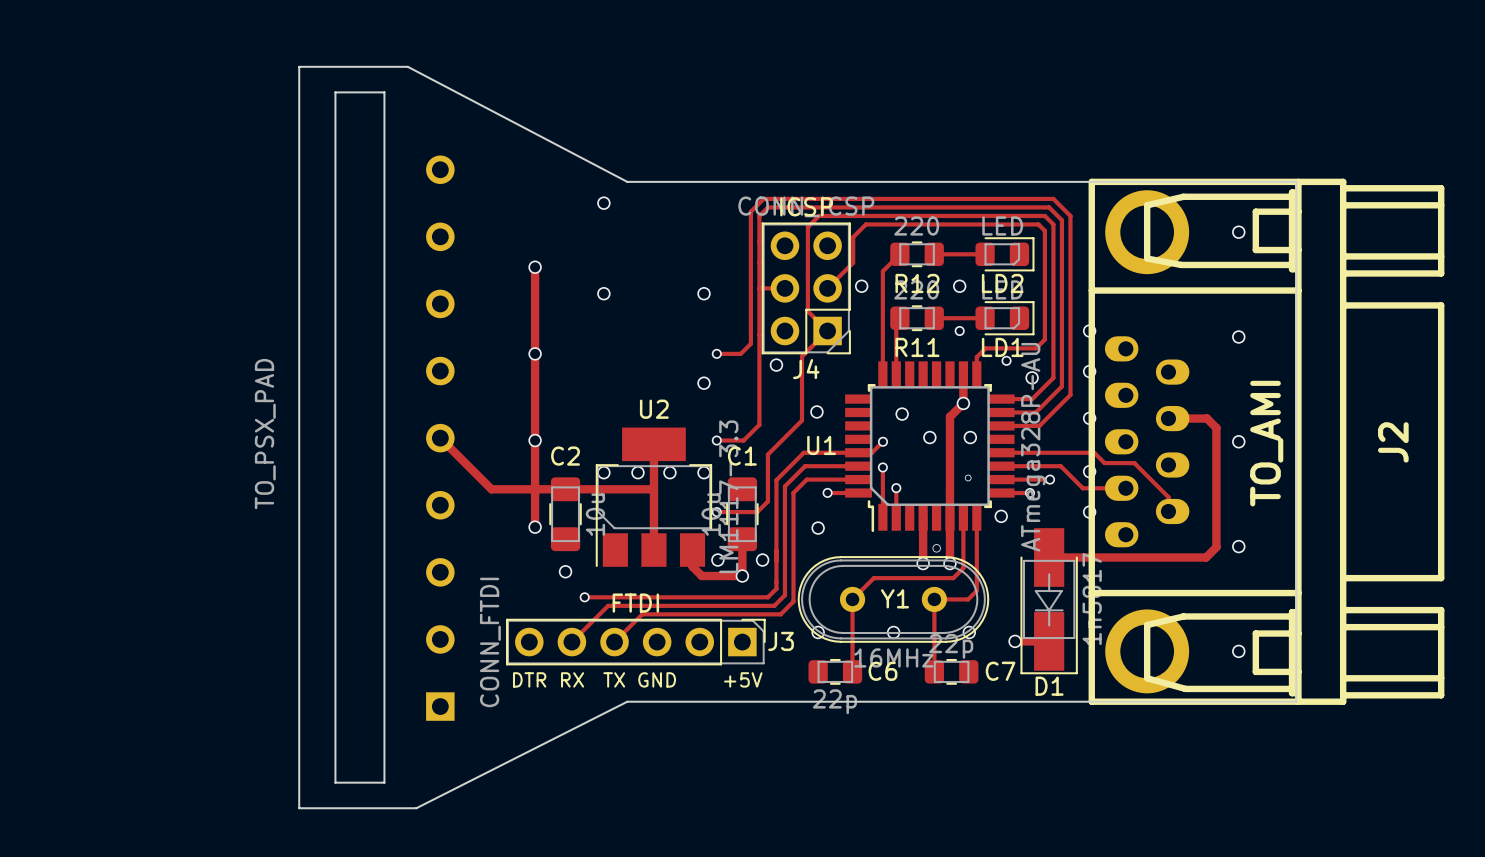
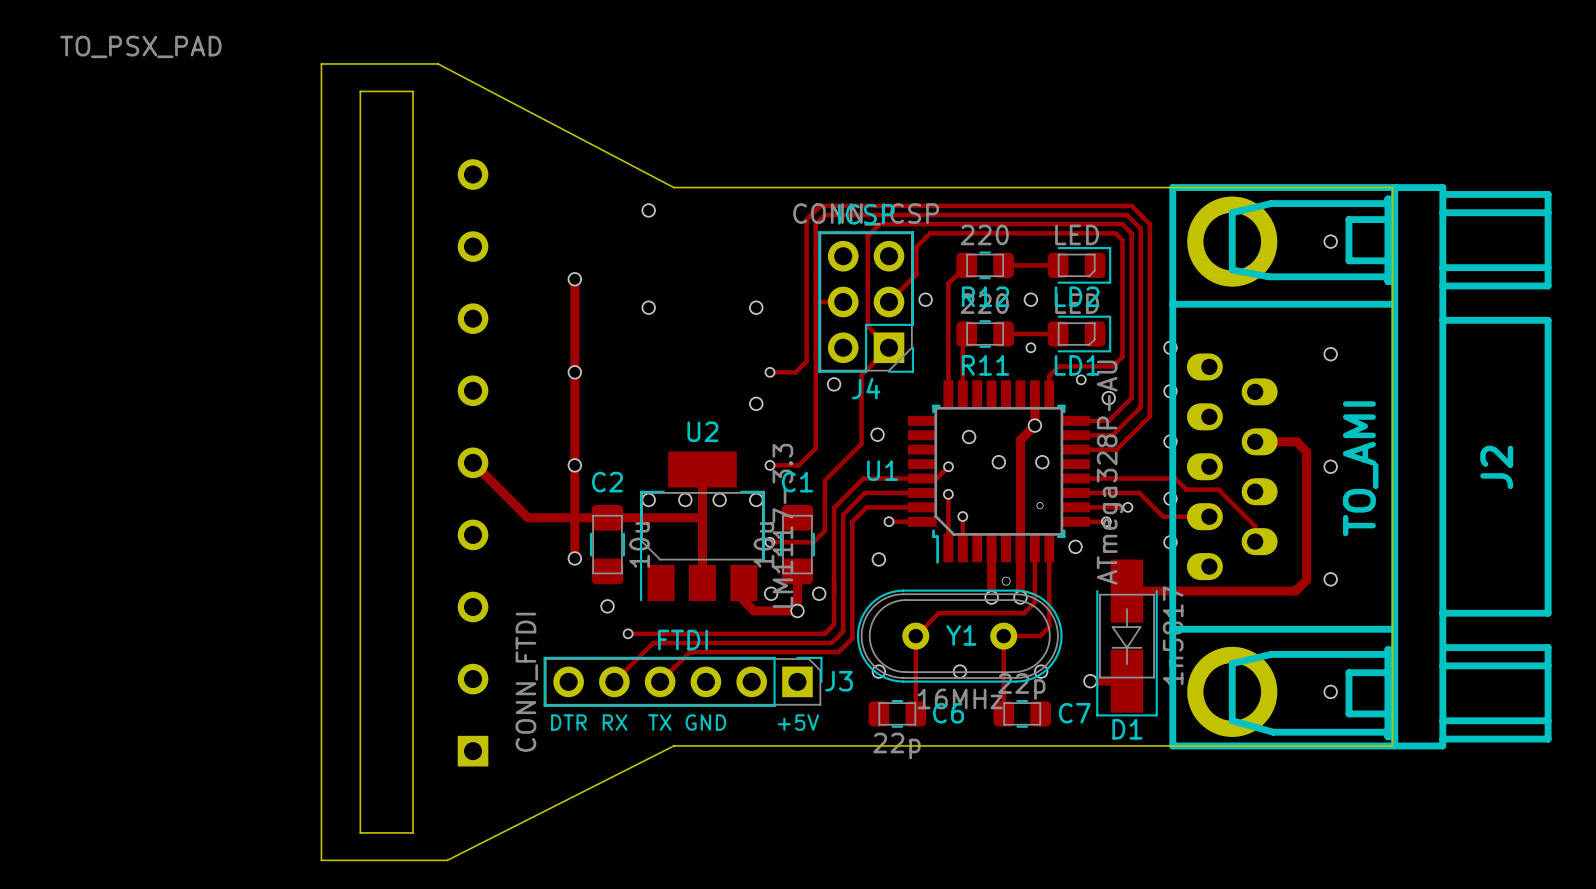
part value rotation: 0° (265, 434) -> 90° clockwise (140, 46)
part value position: TO_PSX_PAD (265, 434) -> TO_PSX_PAD (140, 46)

